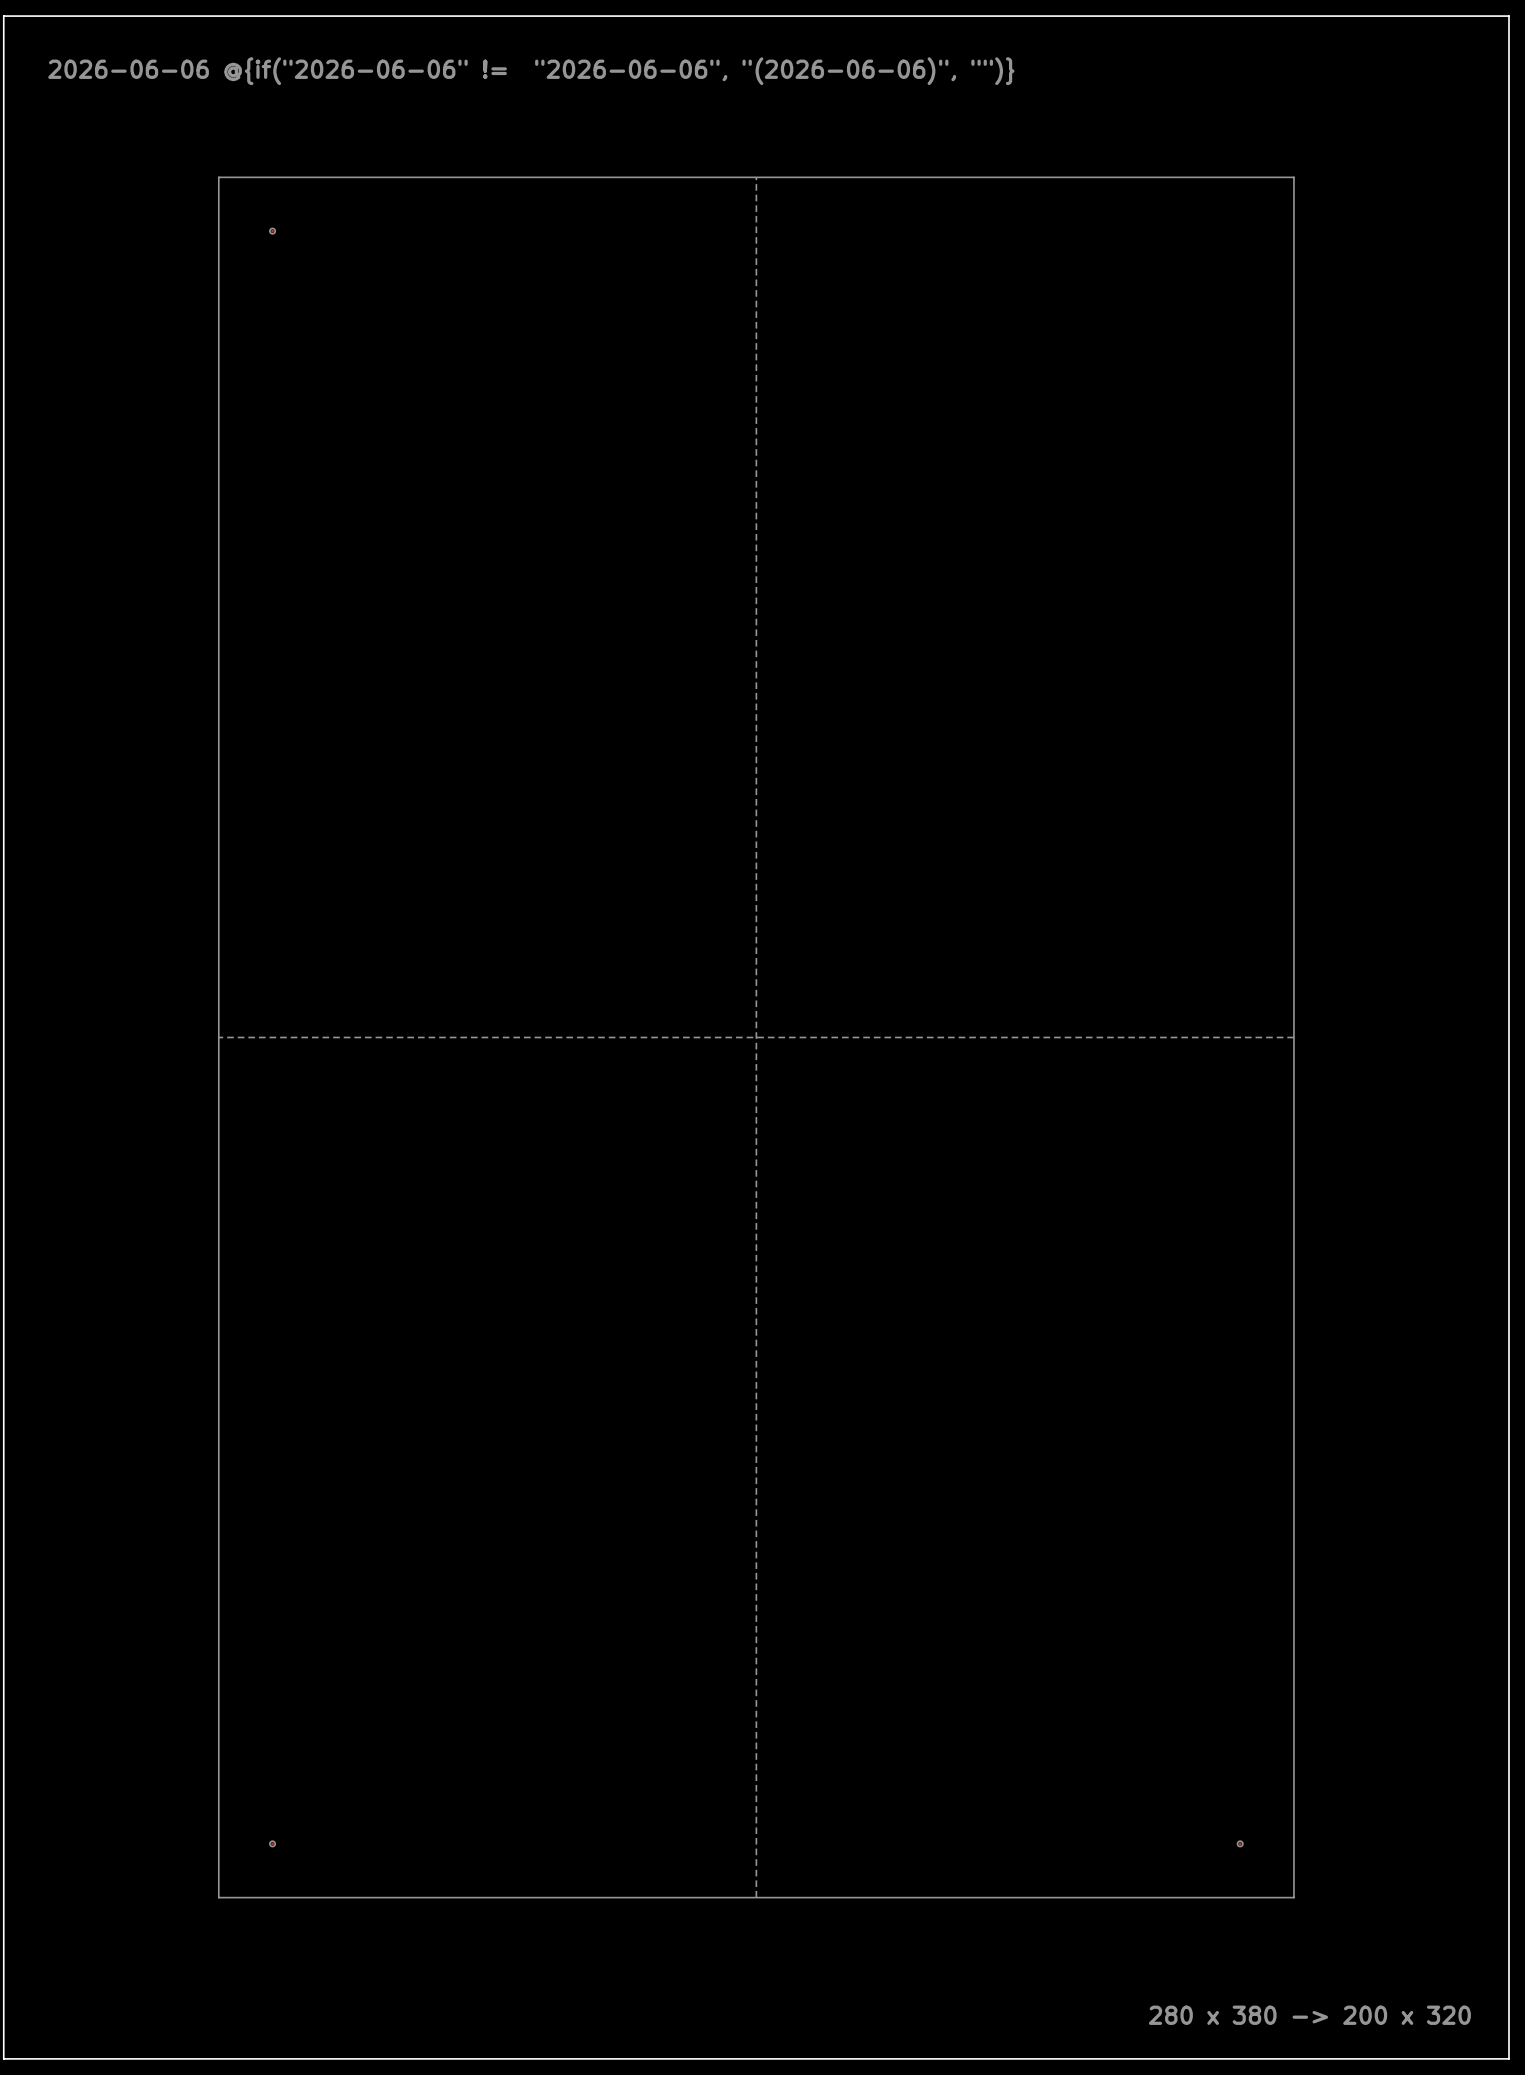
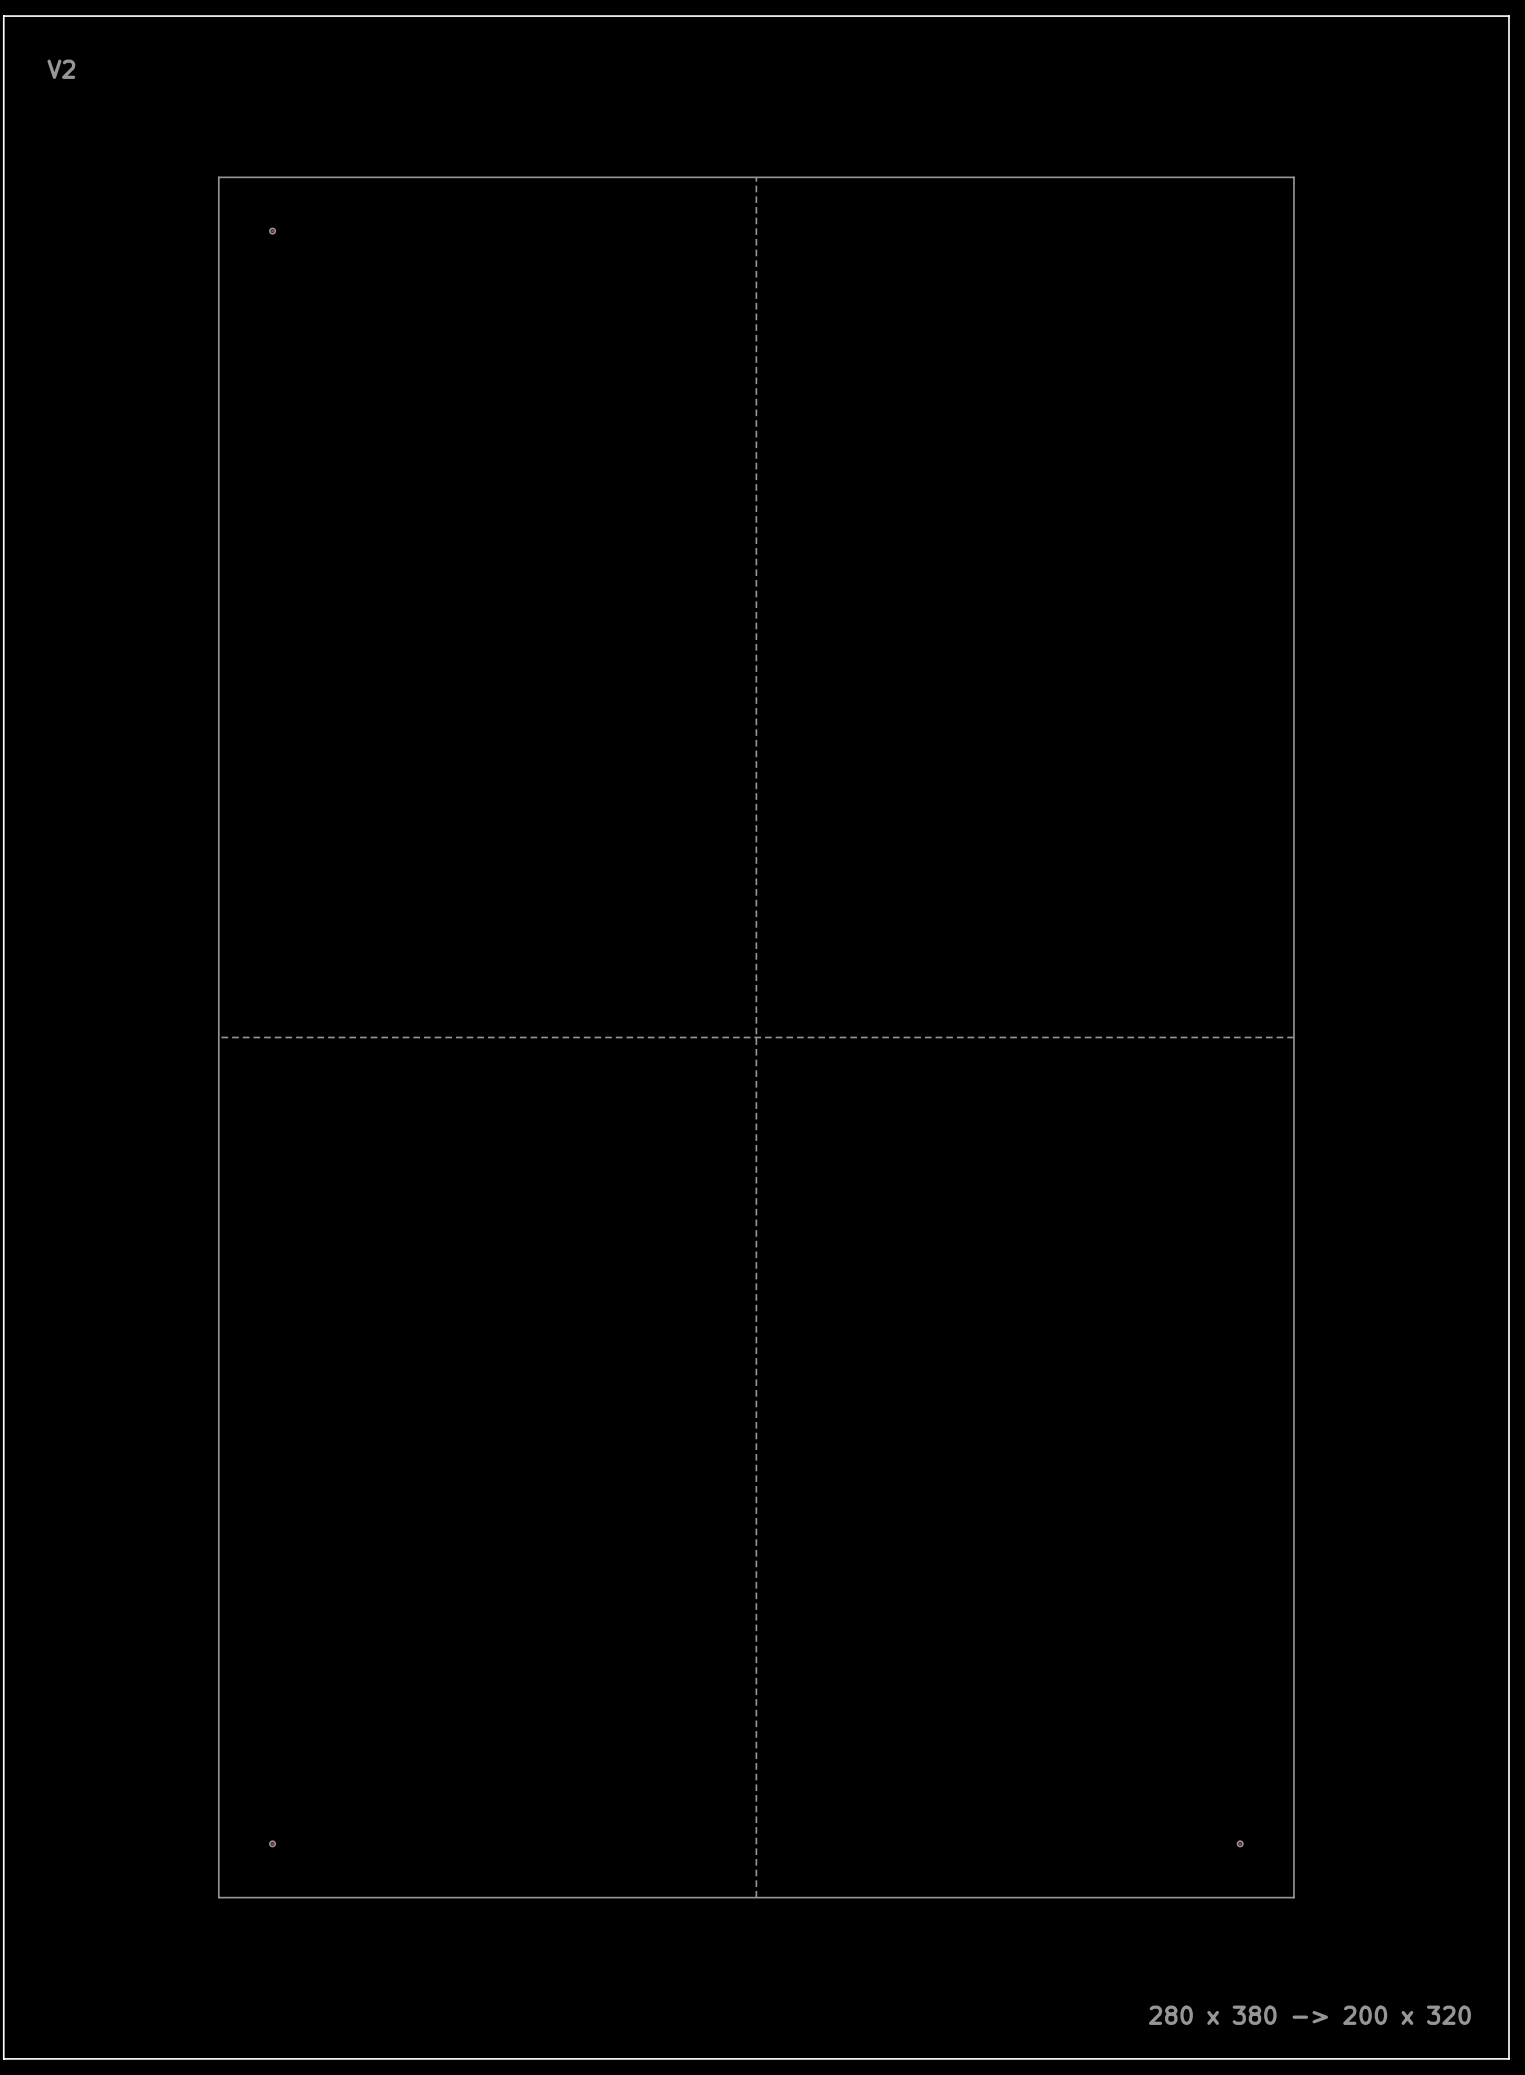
text: 2026-06-06 @{if("2026-06-06" != "2026-06-06", "(2026-06-06)", "")} (531, 71) -> V2 (61, 69)

